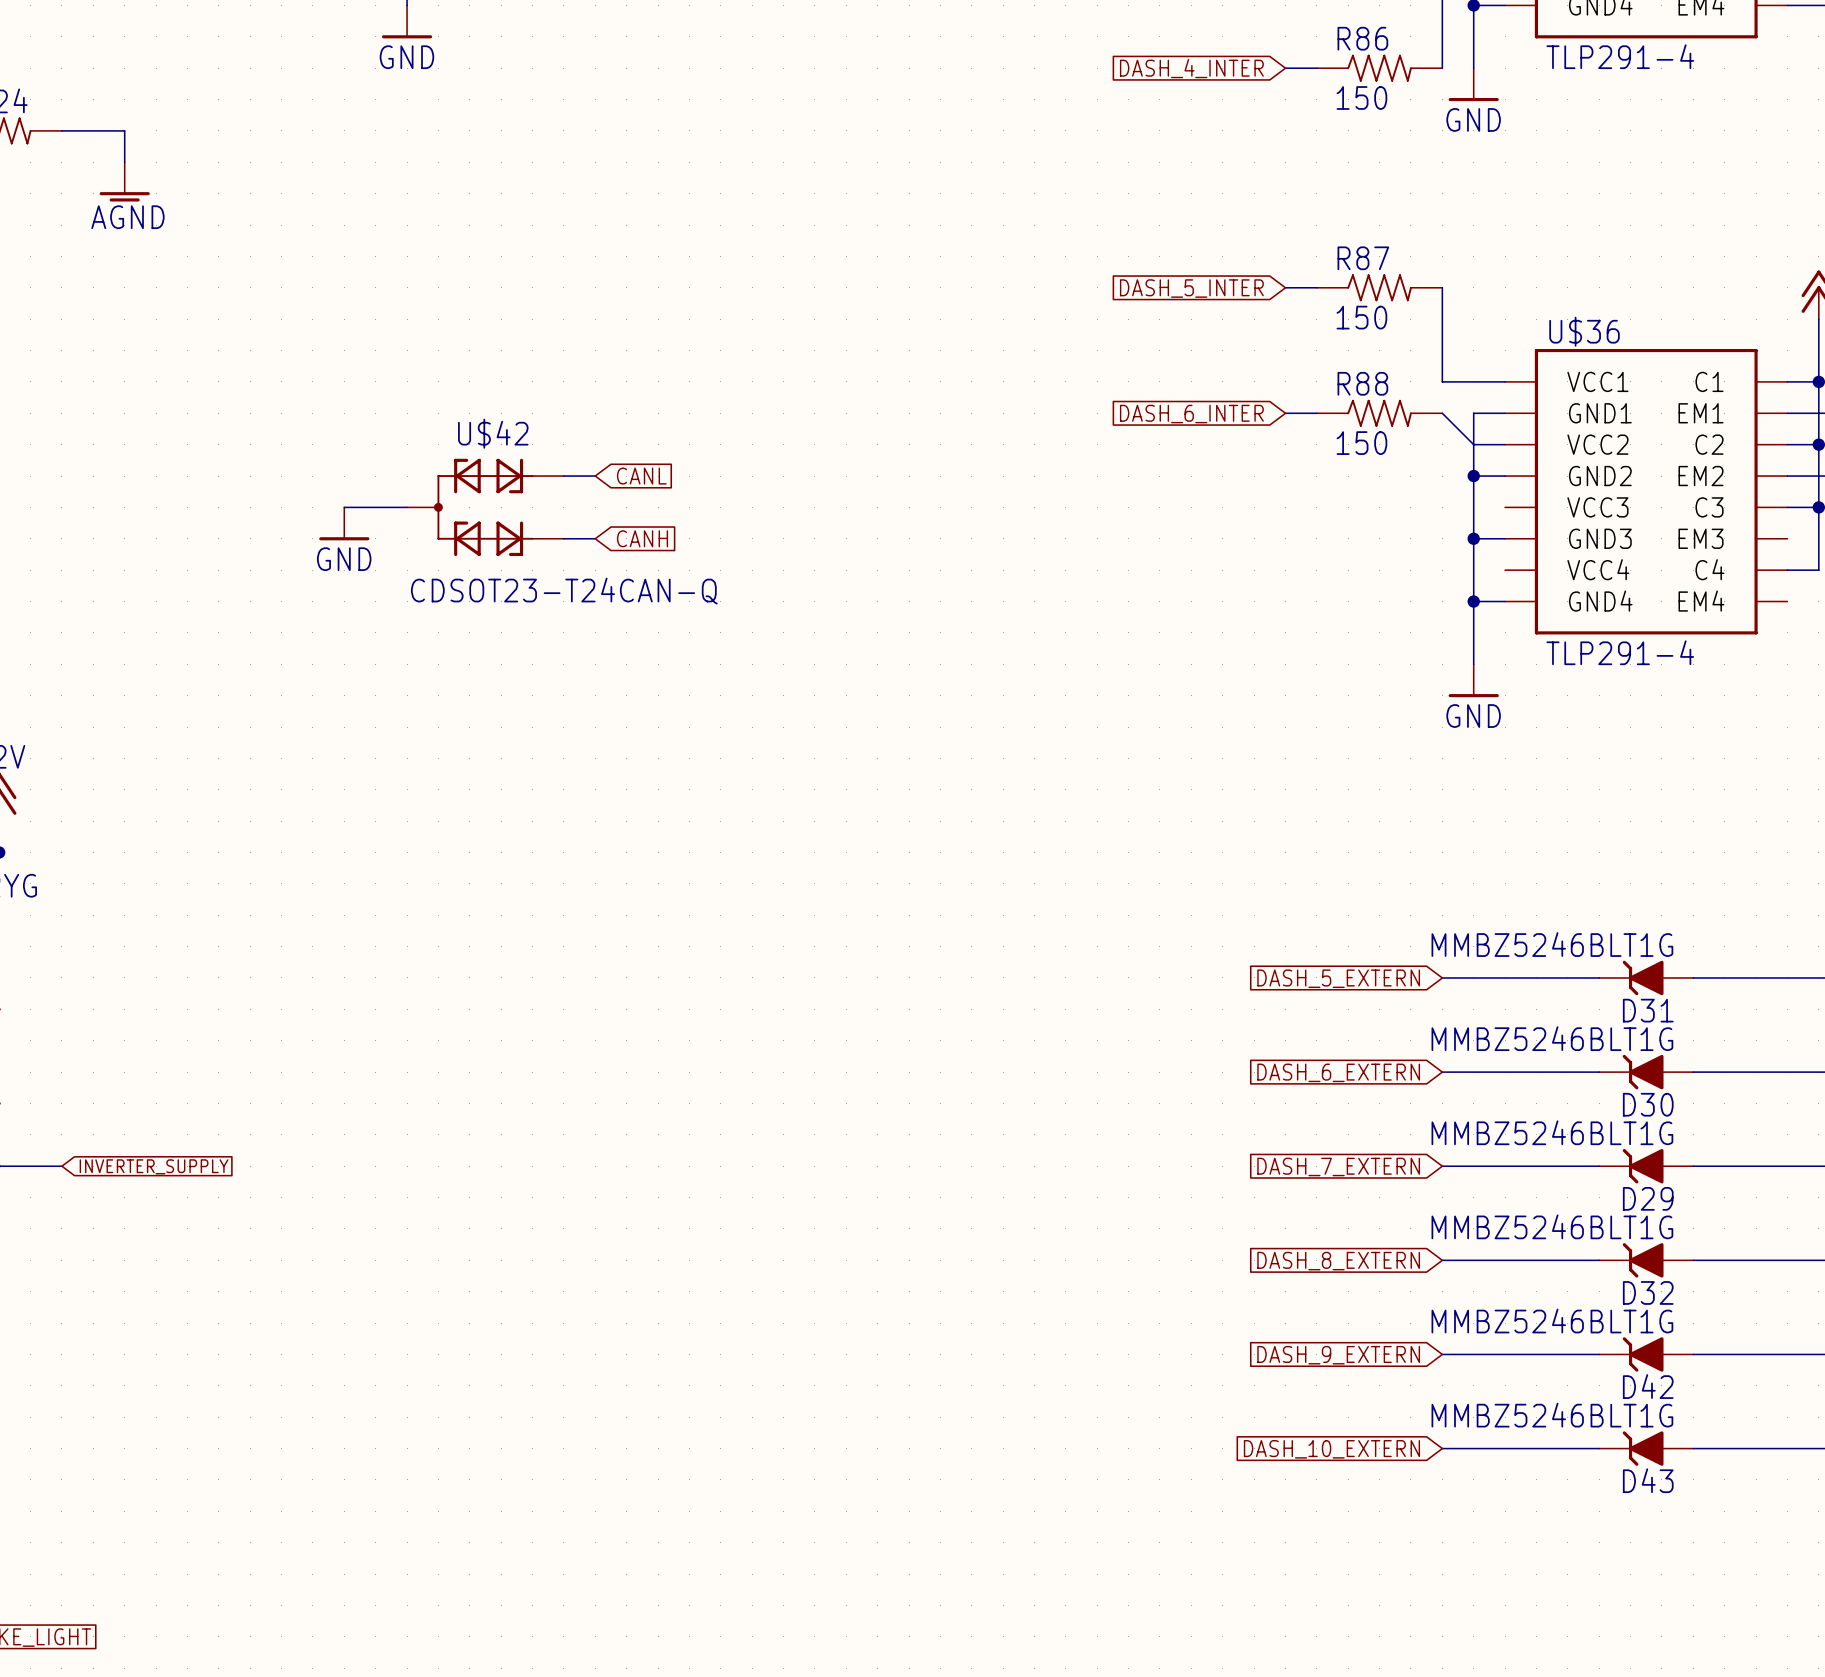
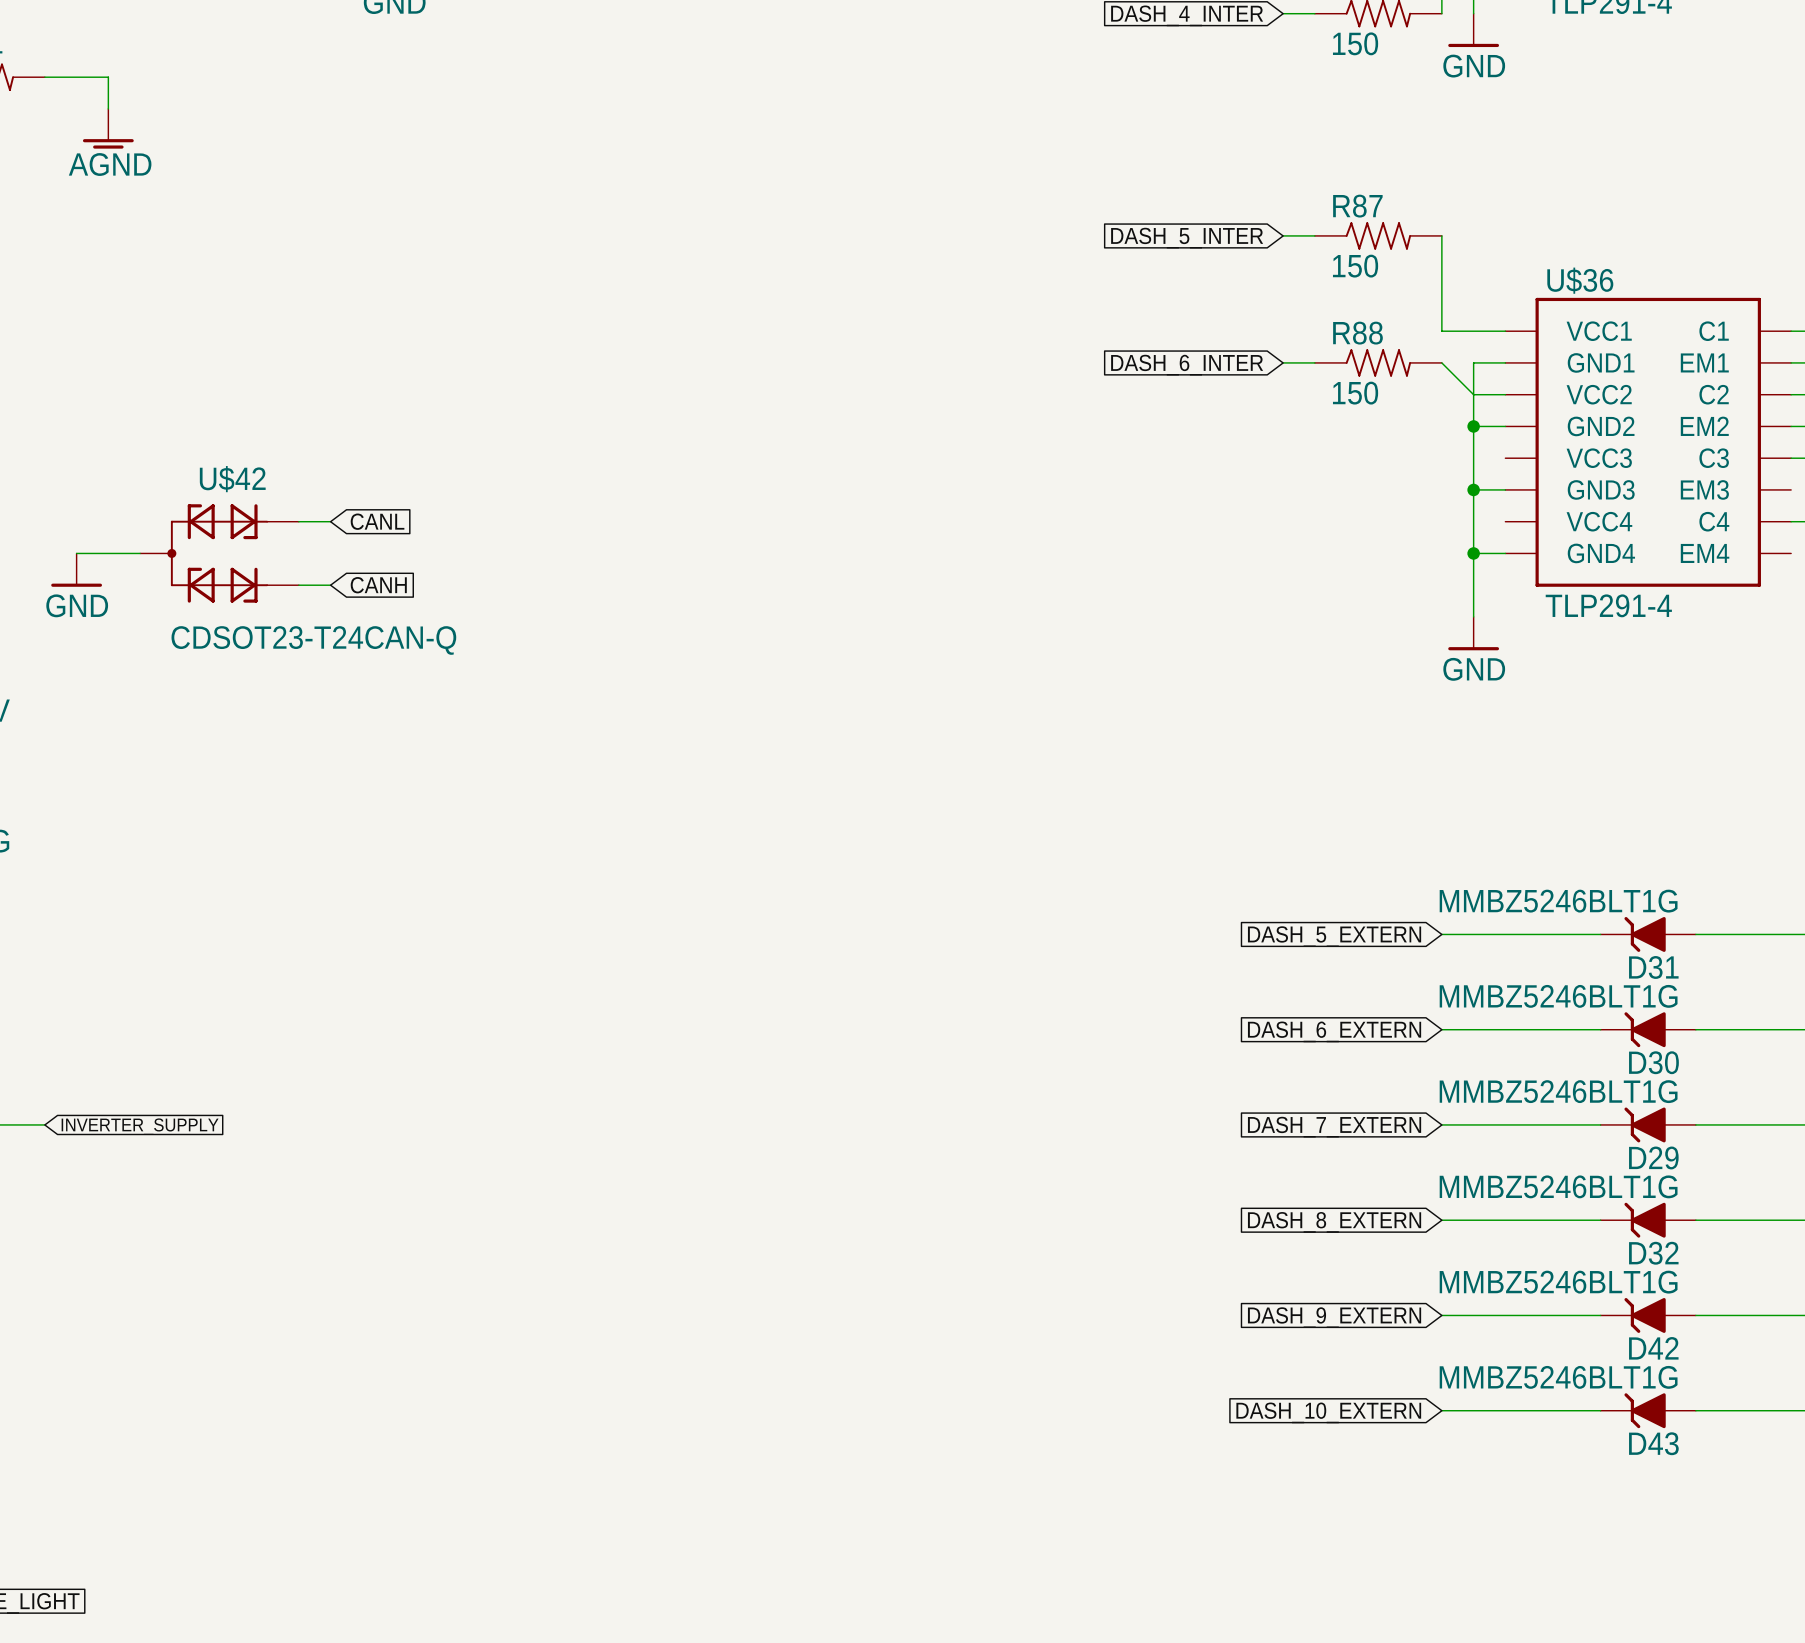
wire: (563, 476) (595, 476) -> (298, 585) (330, 585)
global label position: CANL (641, 476) -> CANL (377, 521)
wire: (344, 507) (407, 507) -> (76, 553) (140, 553)
U$42 position: (485, 507) -> (219, 553)
power symbol position: GND (344, 523) -> GND (76, 570)
wire: (563, 538) (595, 538) -> (298, 521) (330, 521)
global label position: CANH (642, 538) -> CANH (378, 585)

